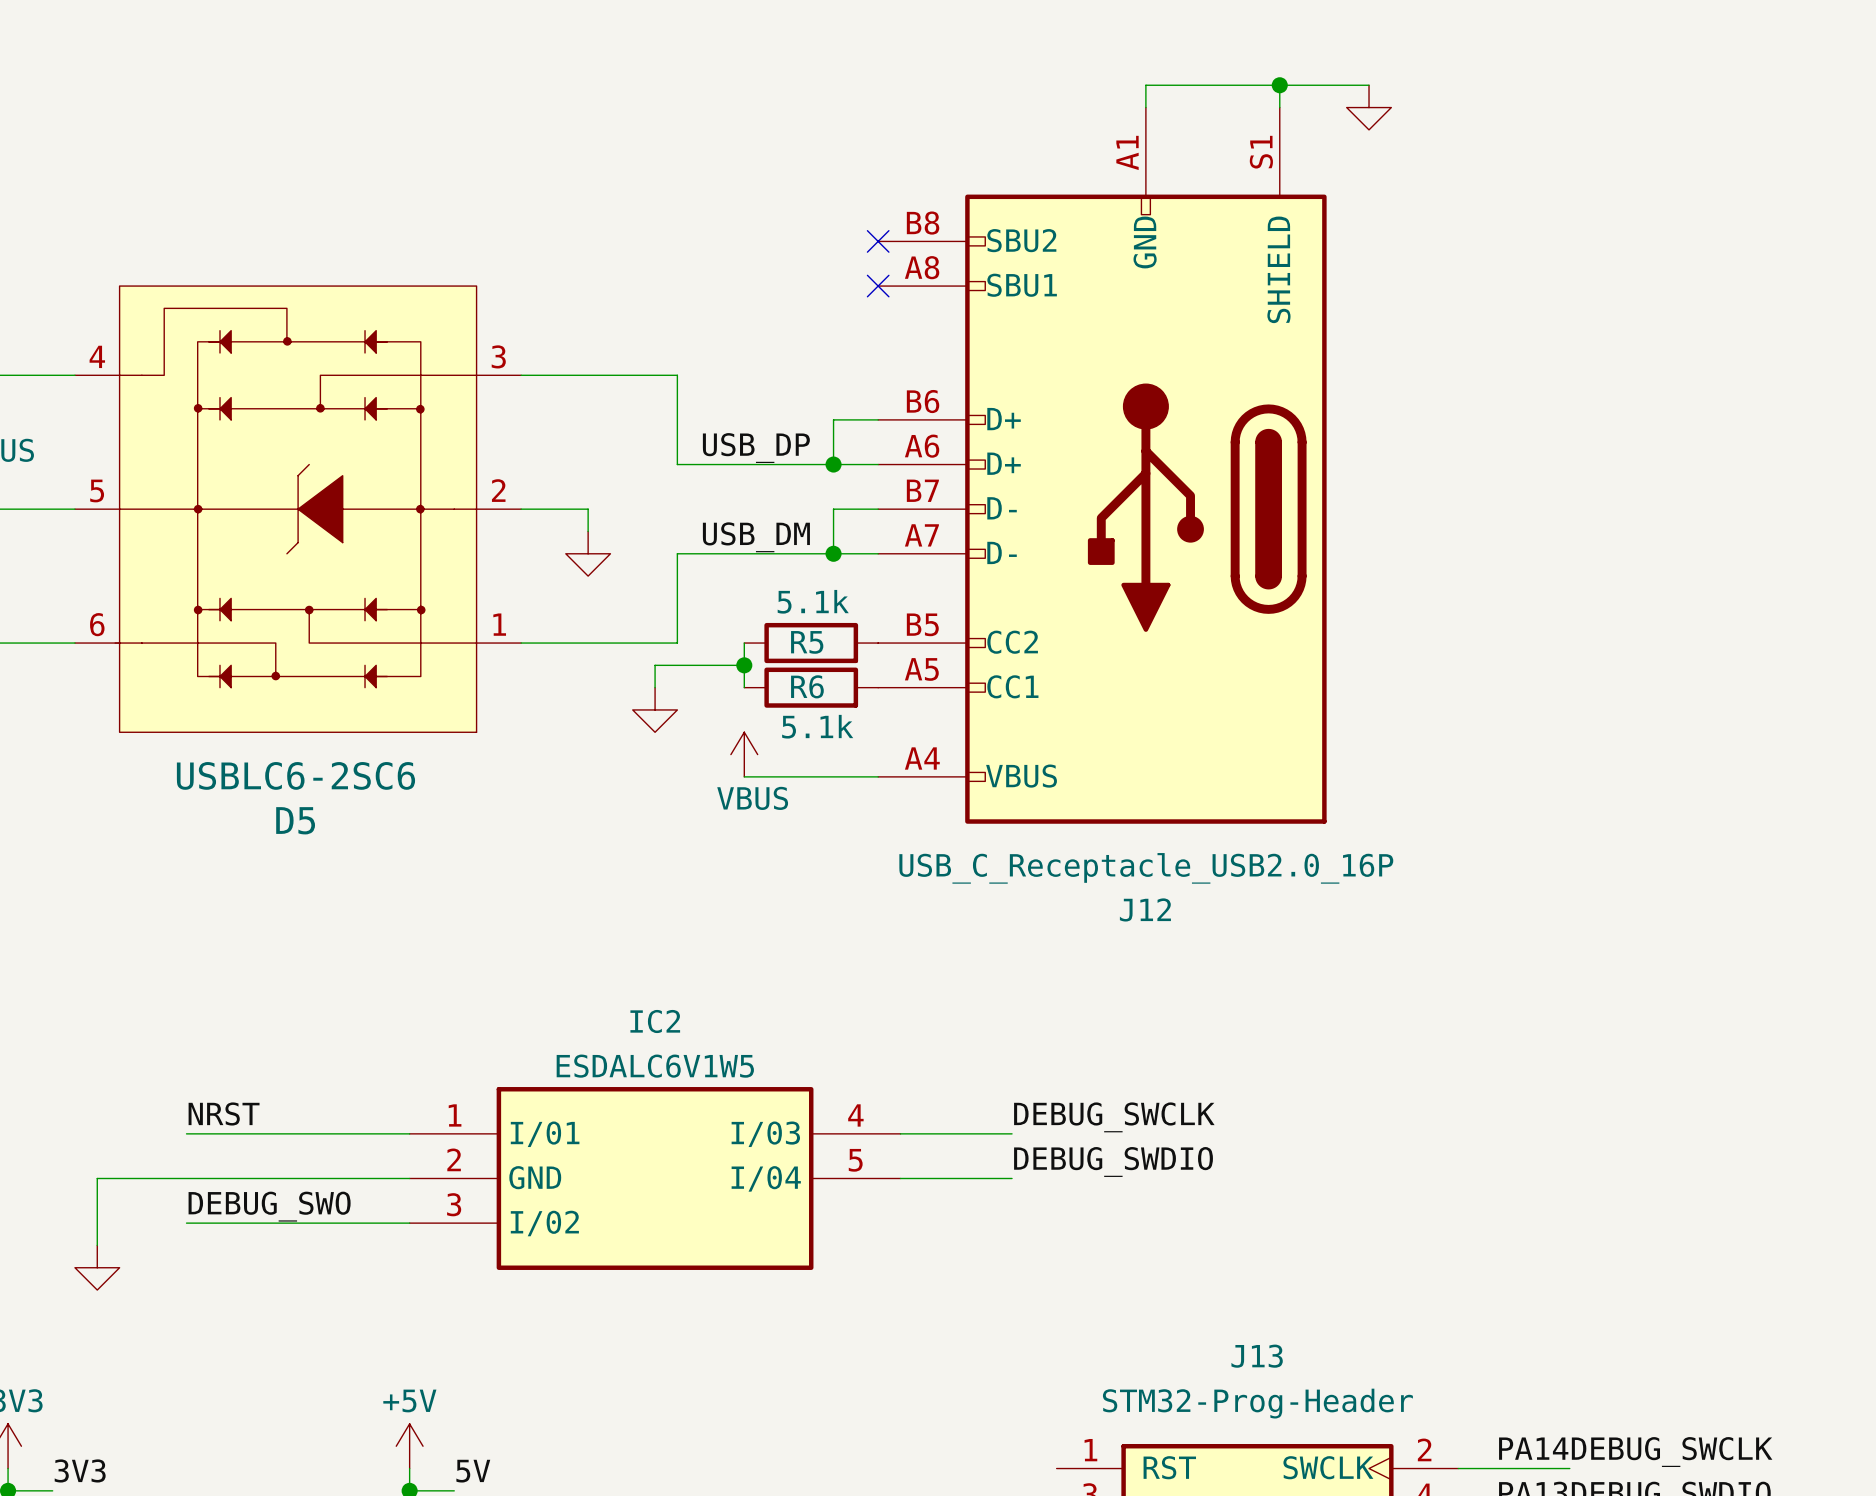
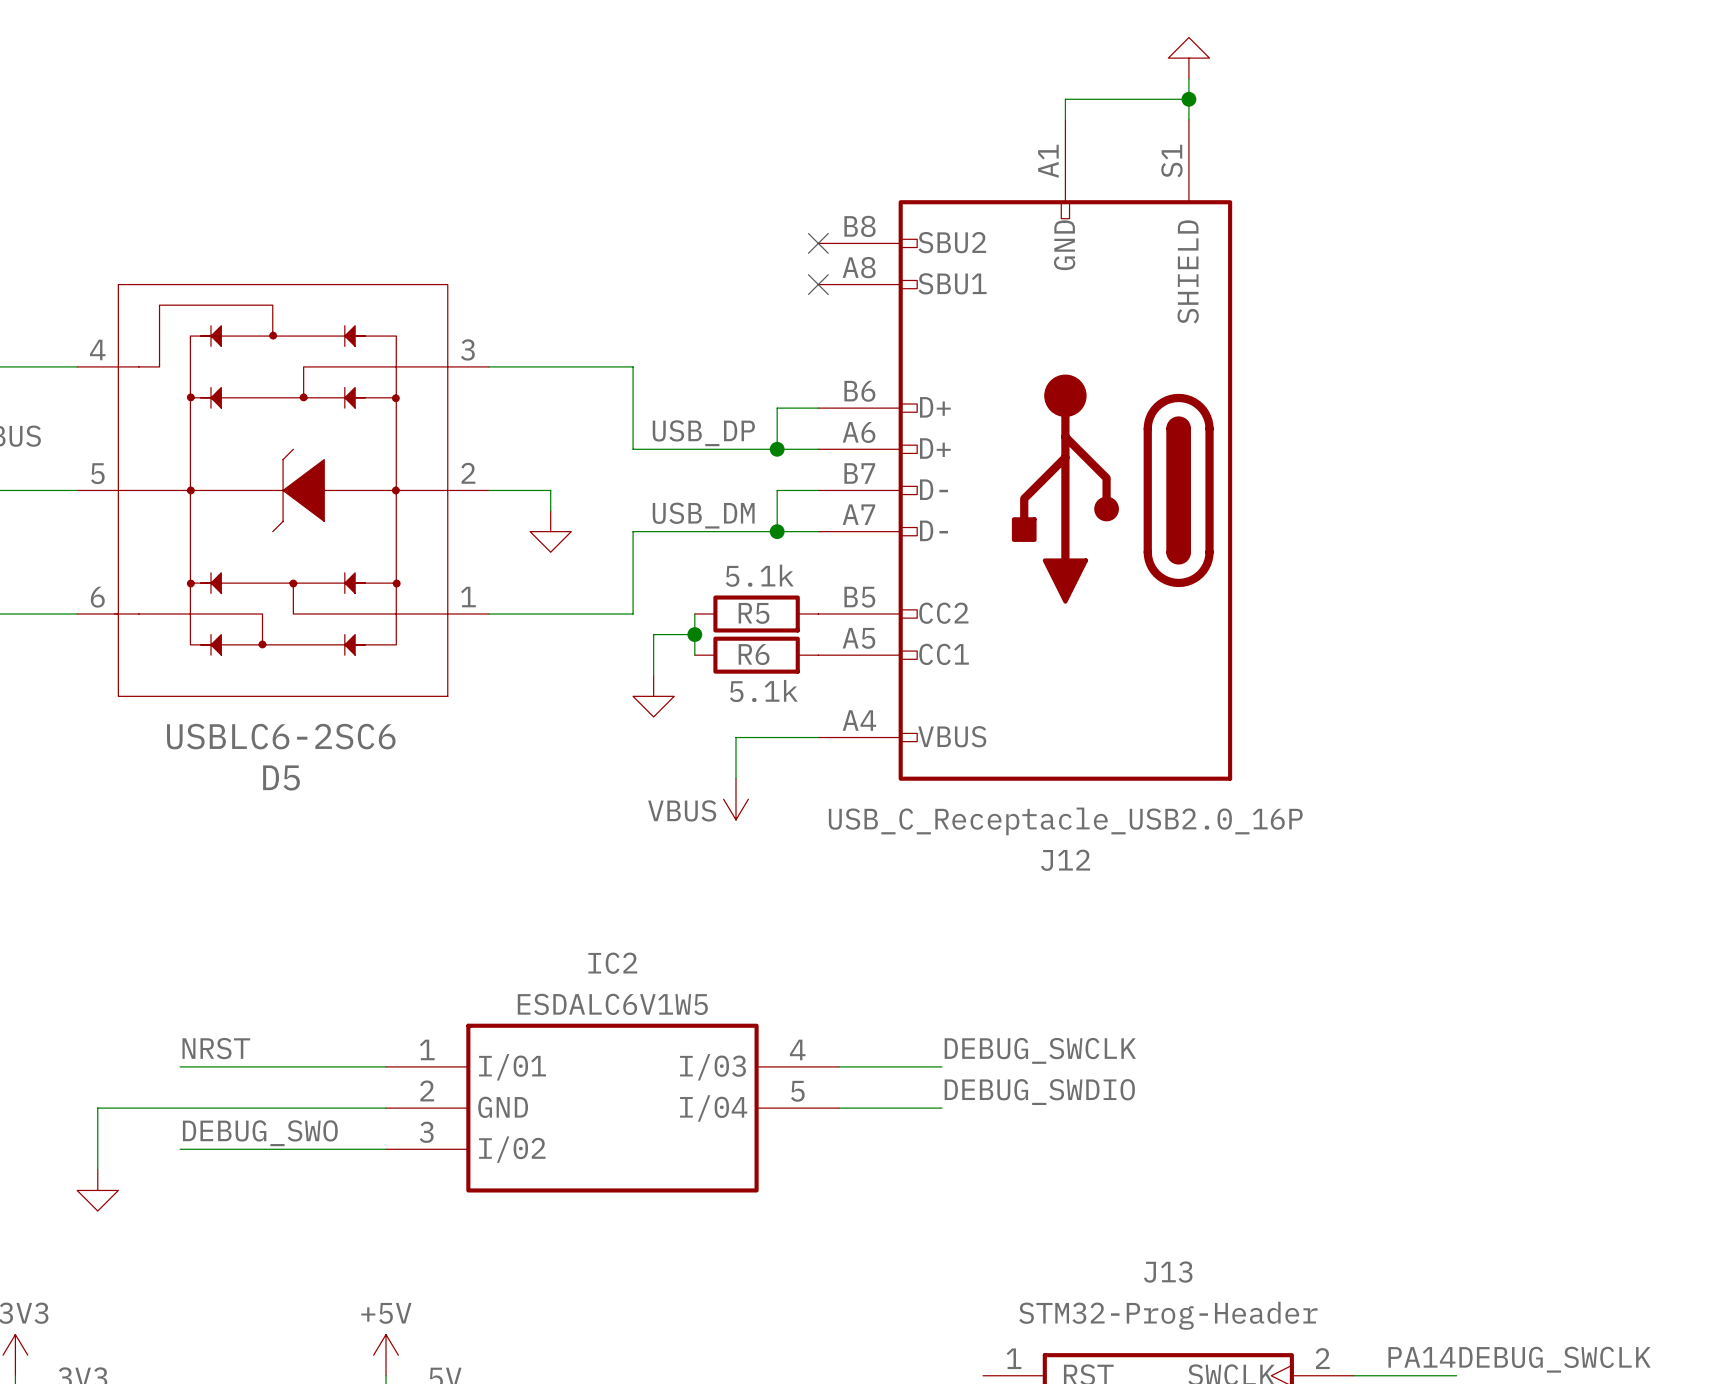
wire: (1279, 85) (1369, 85) -> (1188, 99) (1188, 78)
power symbol rotation: 0° (1369, 107) -> 180° (1188, 58)
power symbol position: (1369, 107) -> (1188, 58)
wire: (699, 665) (655, 665) (655, 687) -> (653, 634) (653, 675)
power symbol position: (655, 709) -> (653, 696)
power symbol rotation: 0° (744, 754) -> 180° (736, 799)
power symbol position: VBUS (744, 754) -> VBUS (736, 799)
wire: (744, 776) (788, 776) -> (736, 778) (736, 737)
power symbol text position: VBUS (752, 798) -> VBUS (682, 810)

